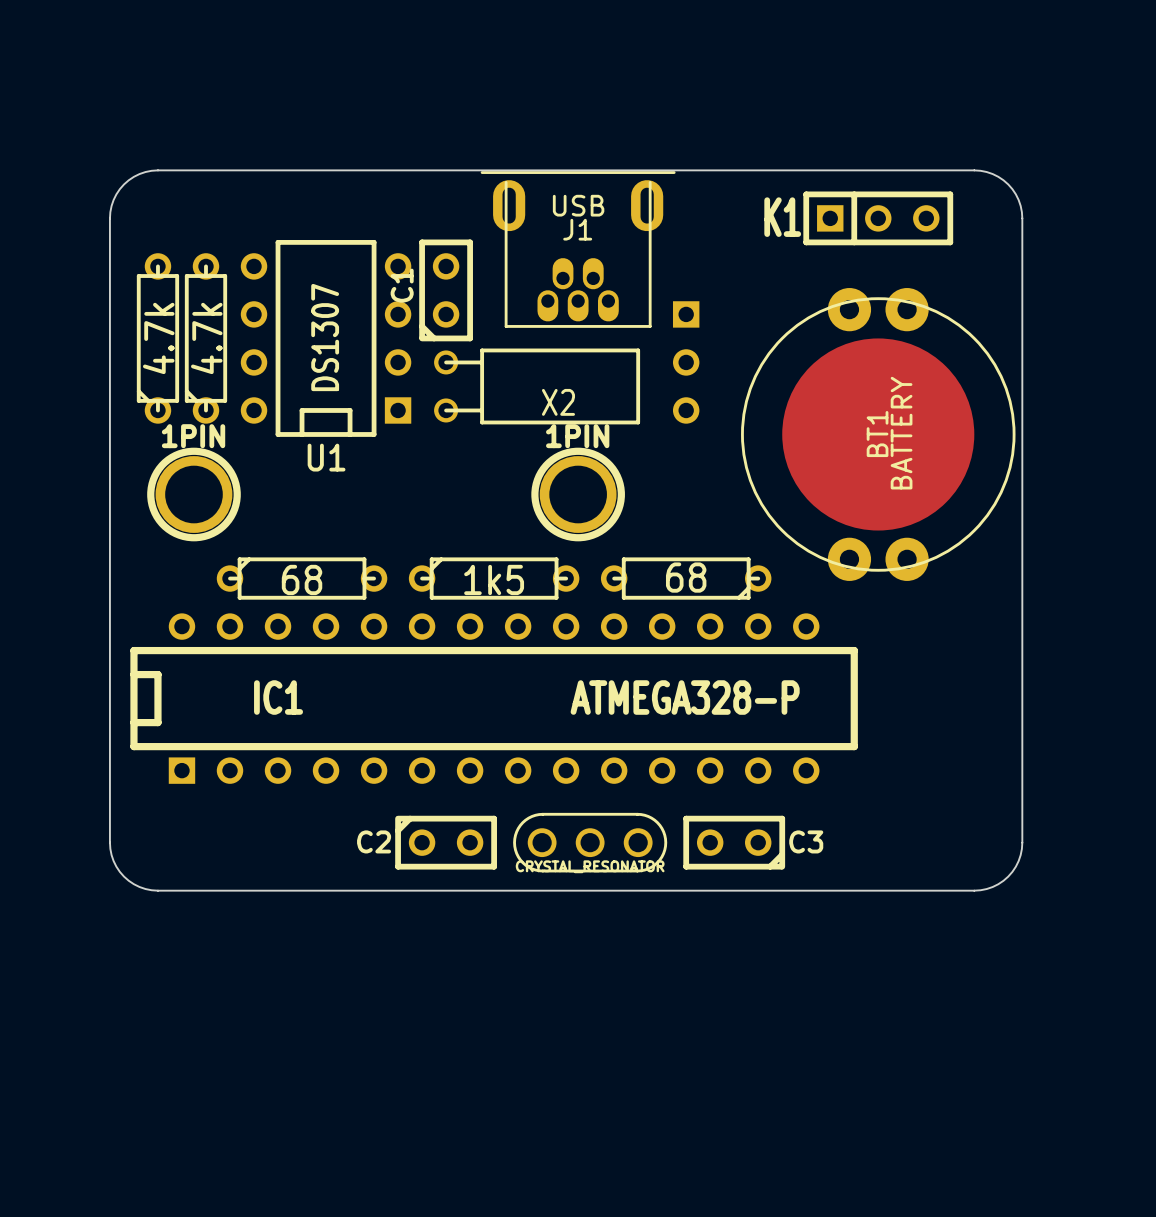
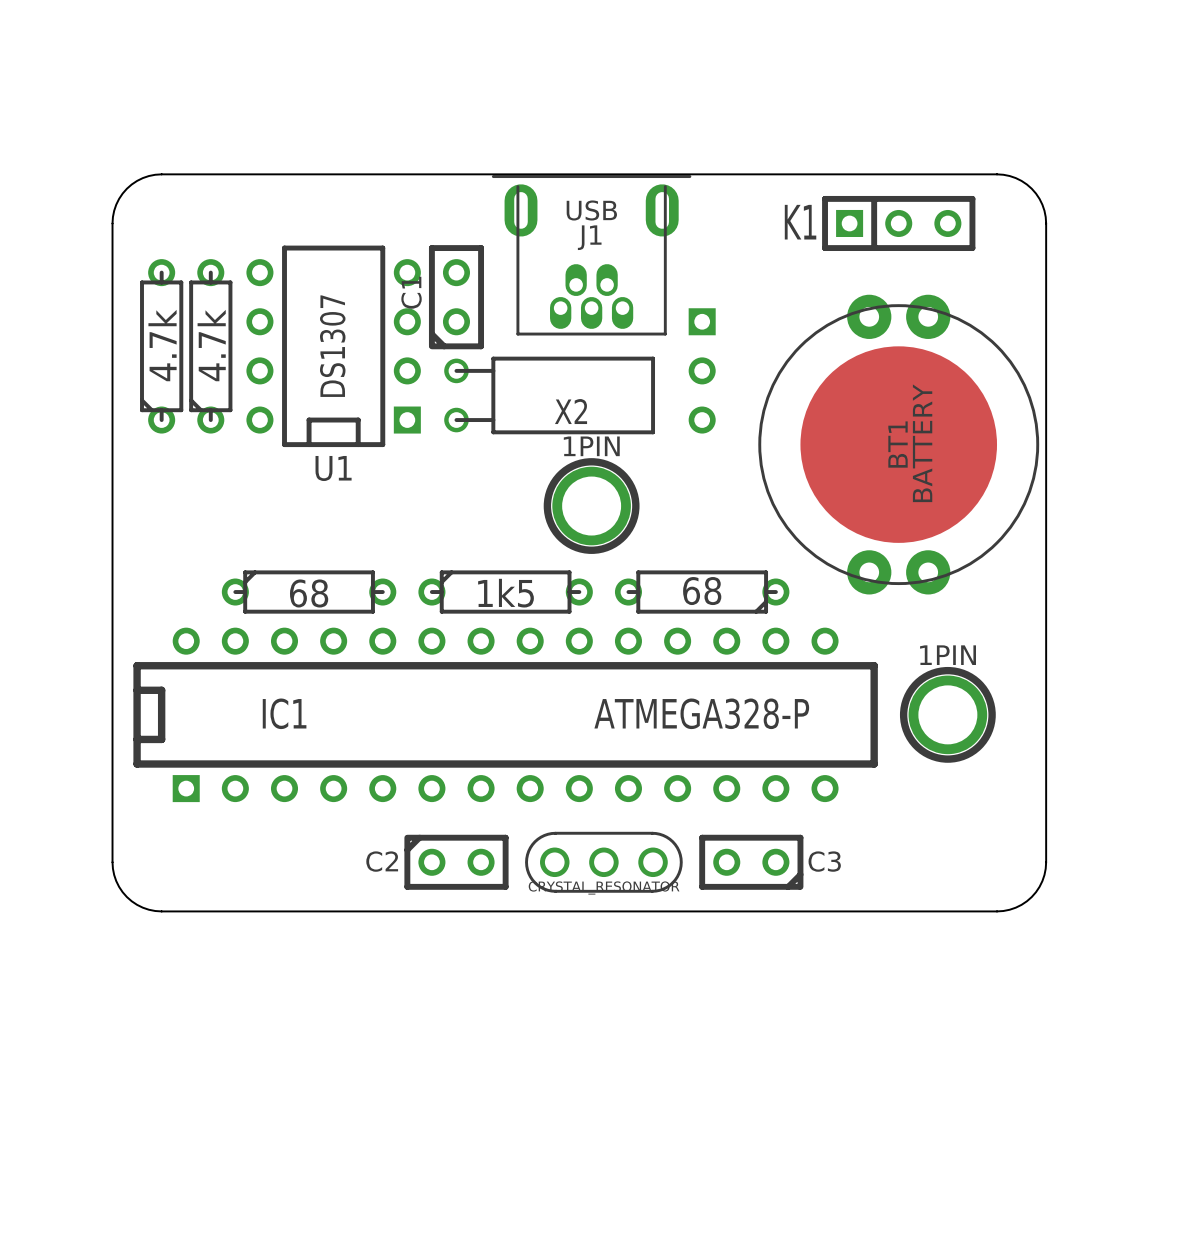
1PIN: (193, 494) -> none
1PIN: none -> (947, 714)

